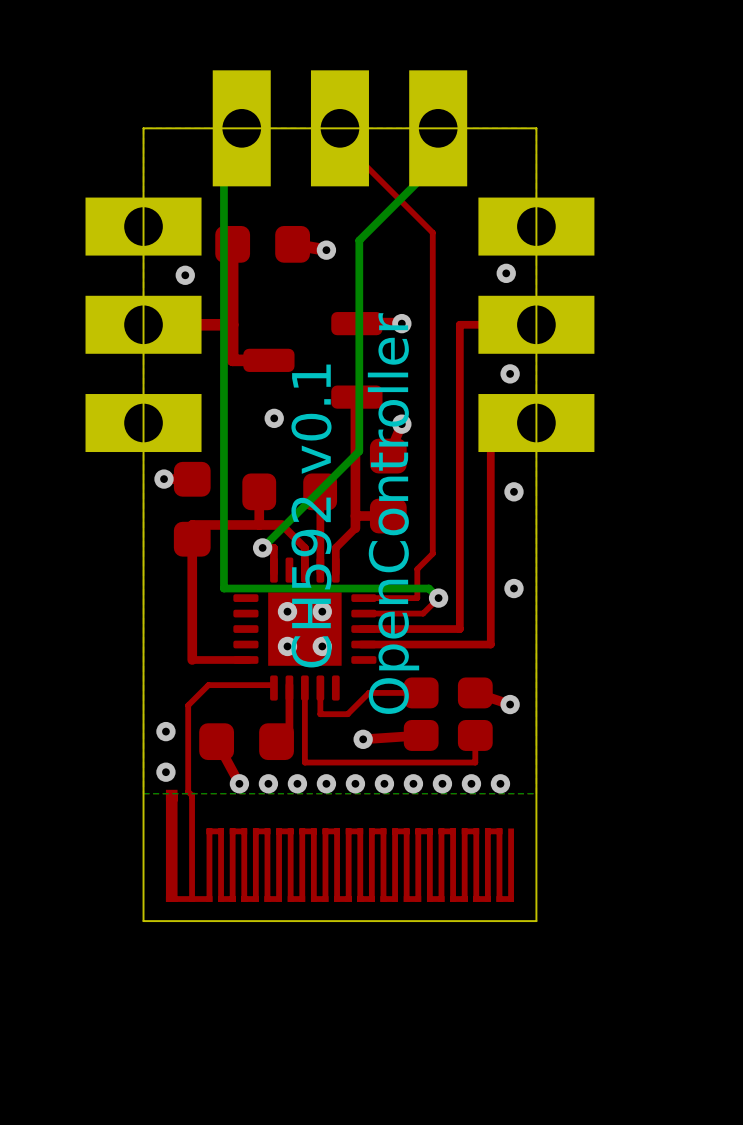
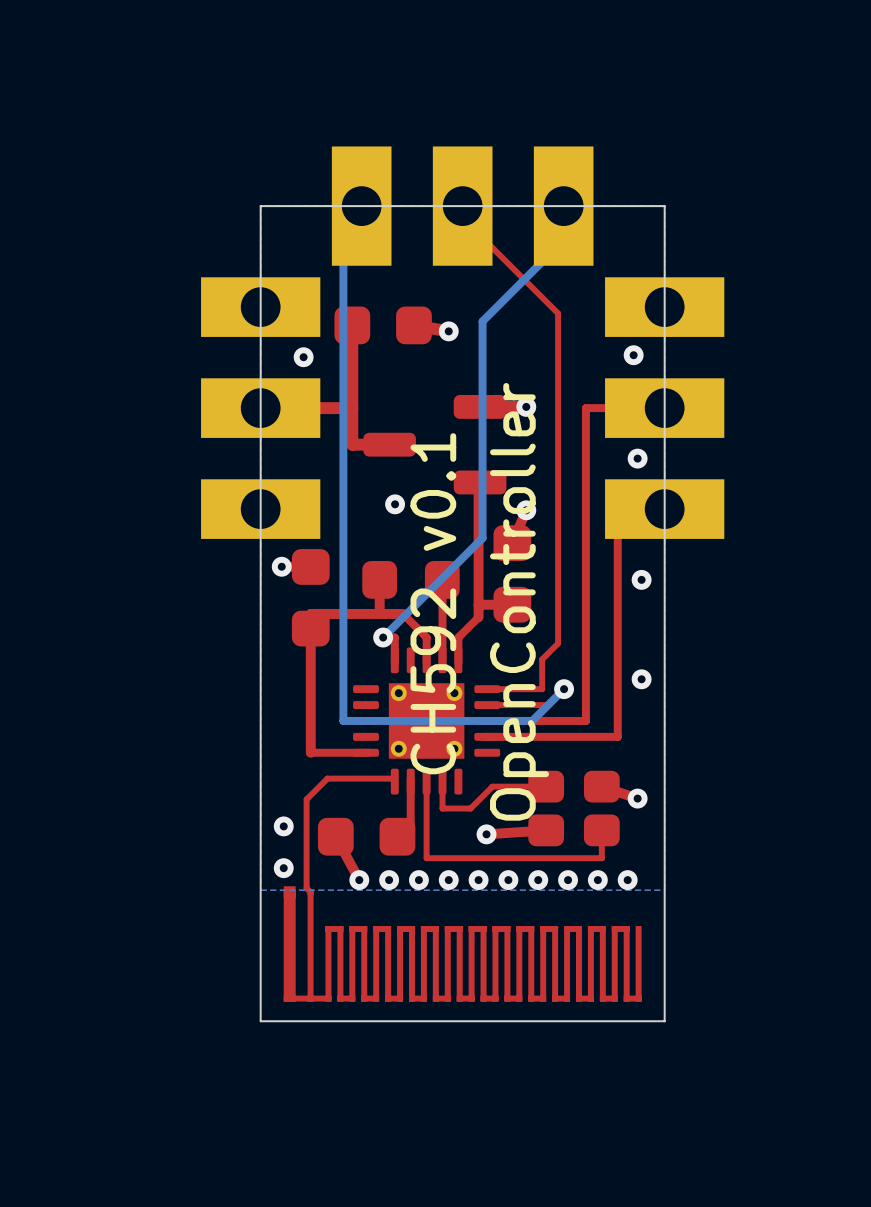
part footprint: [233, 557, 377, 701] -> [353, 647, 501, 795]
bottom track: (223, 588) (428, 588) (438, 598) -> (343, 679) (343, 720) (532, 720) (564, 689)
via: (287, 611) -> none
via: (322, 611) -> none
via: (287, 646) -> none
via: (322, 646) -> none

